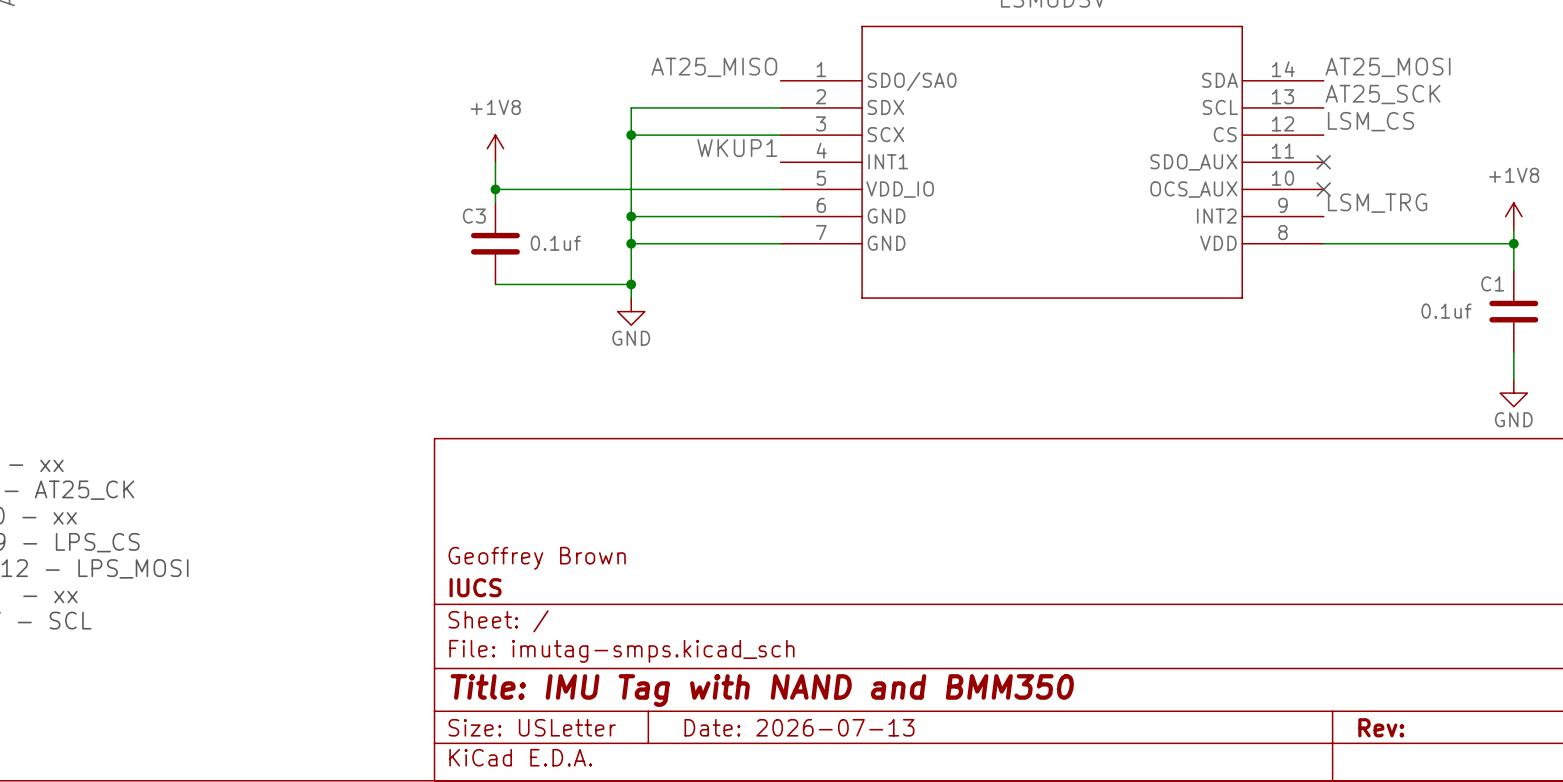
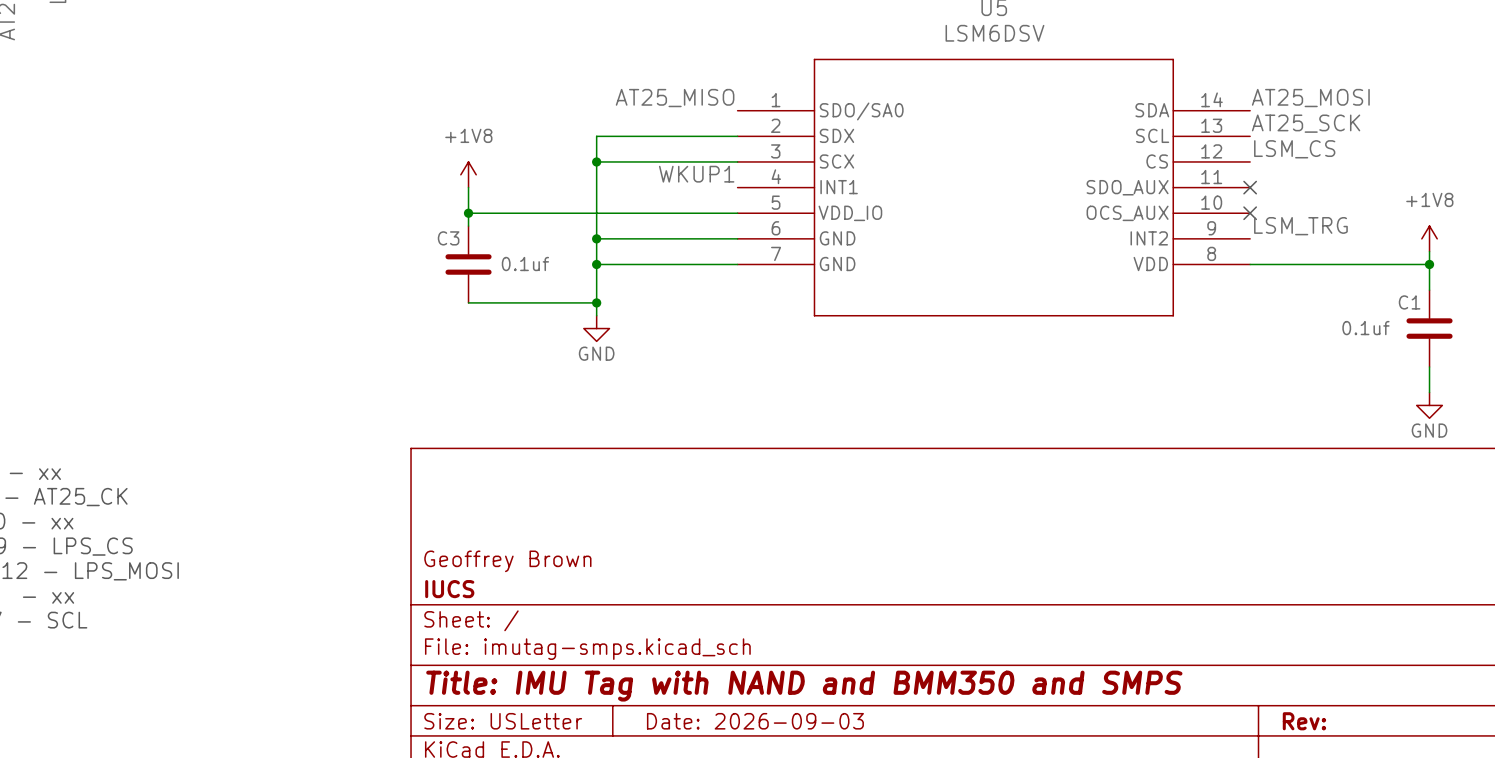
title block: Title: IMU Tag with NAND and BMM350 (762, 690) -> Title: IMU Tag with NAND and BMM350 and SMPS (804, 686)
title block: Date: 2026-07-13 (799, 727) -> Date: 2026-09-03 (755, 721)

